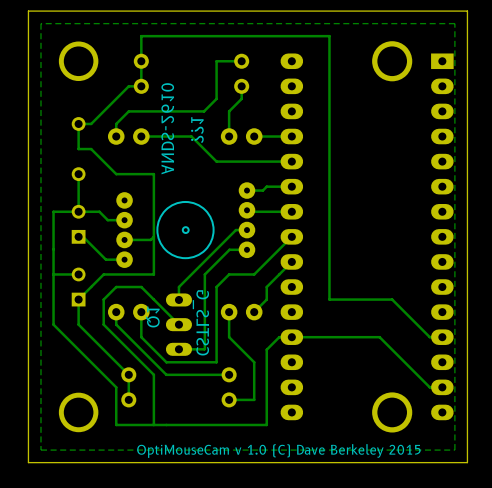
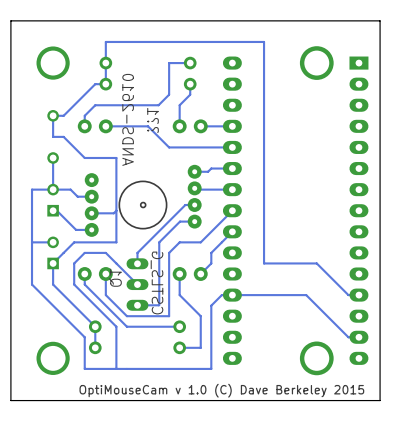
zone outline: (454, 23) (454, 450) (40, 450) (40, 23) (454, 23) -> none

